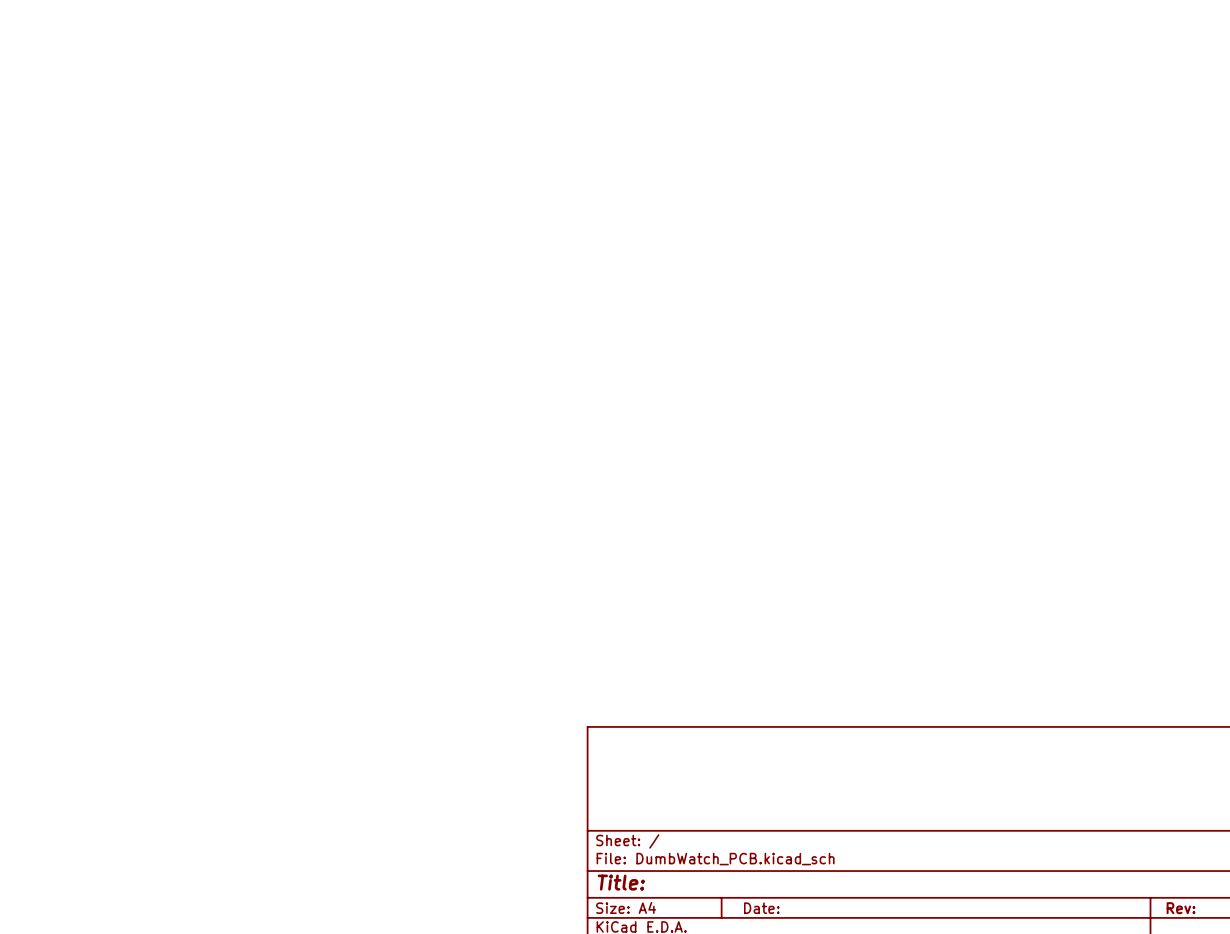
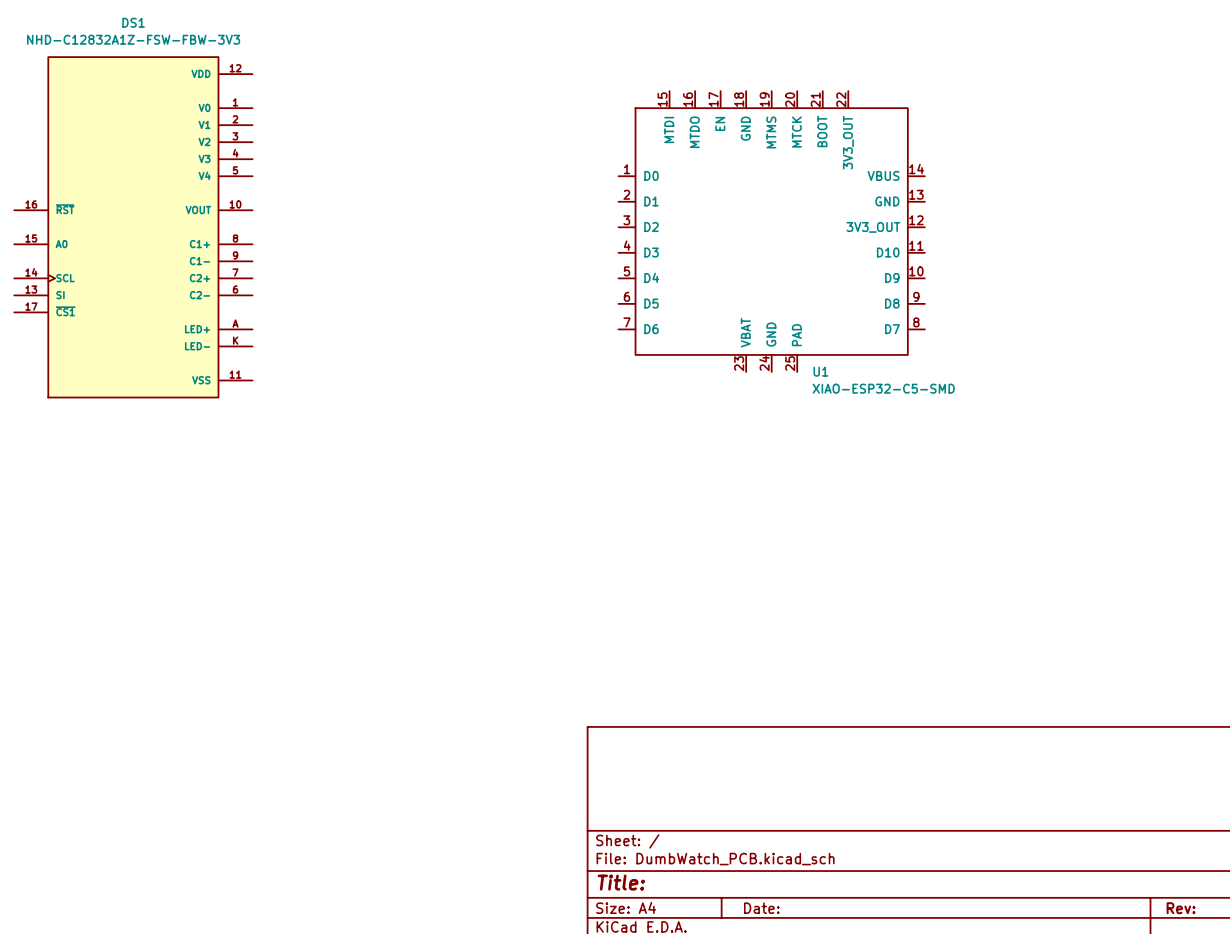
DS1: none -> NHD-C12832A1Z-FSW-FBW-3V3 (133, 227)
U1: none -> XIAO-ESP32-C5-SMD (771, 231)

